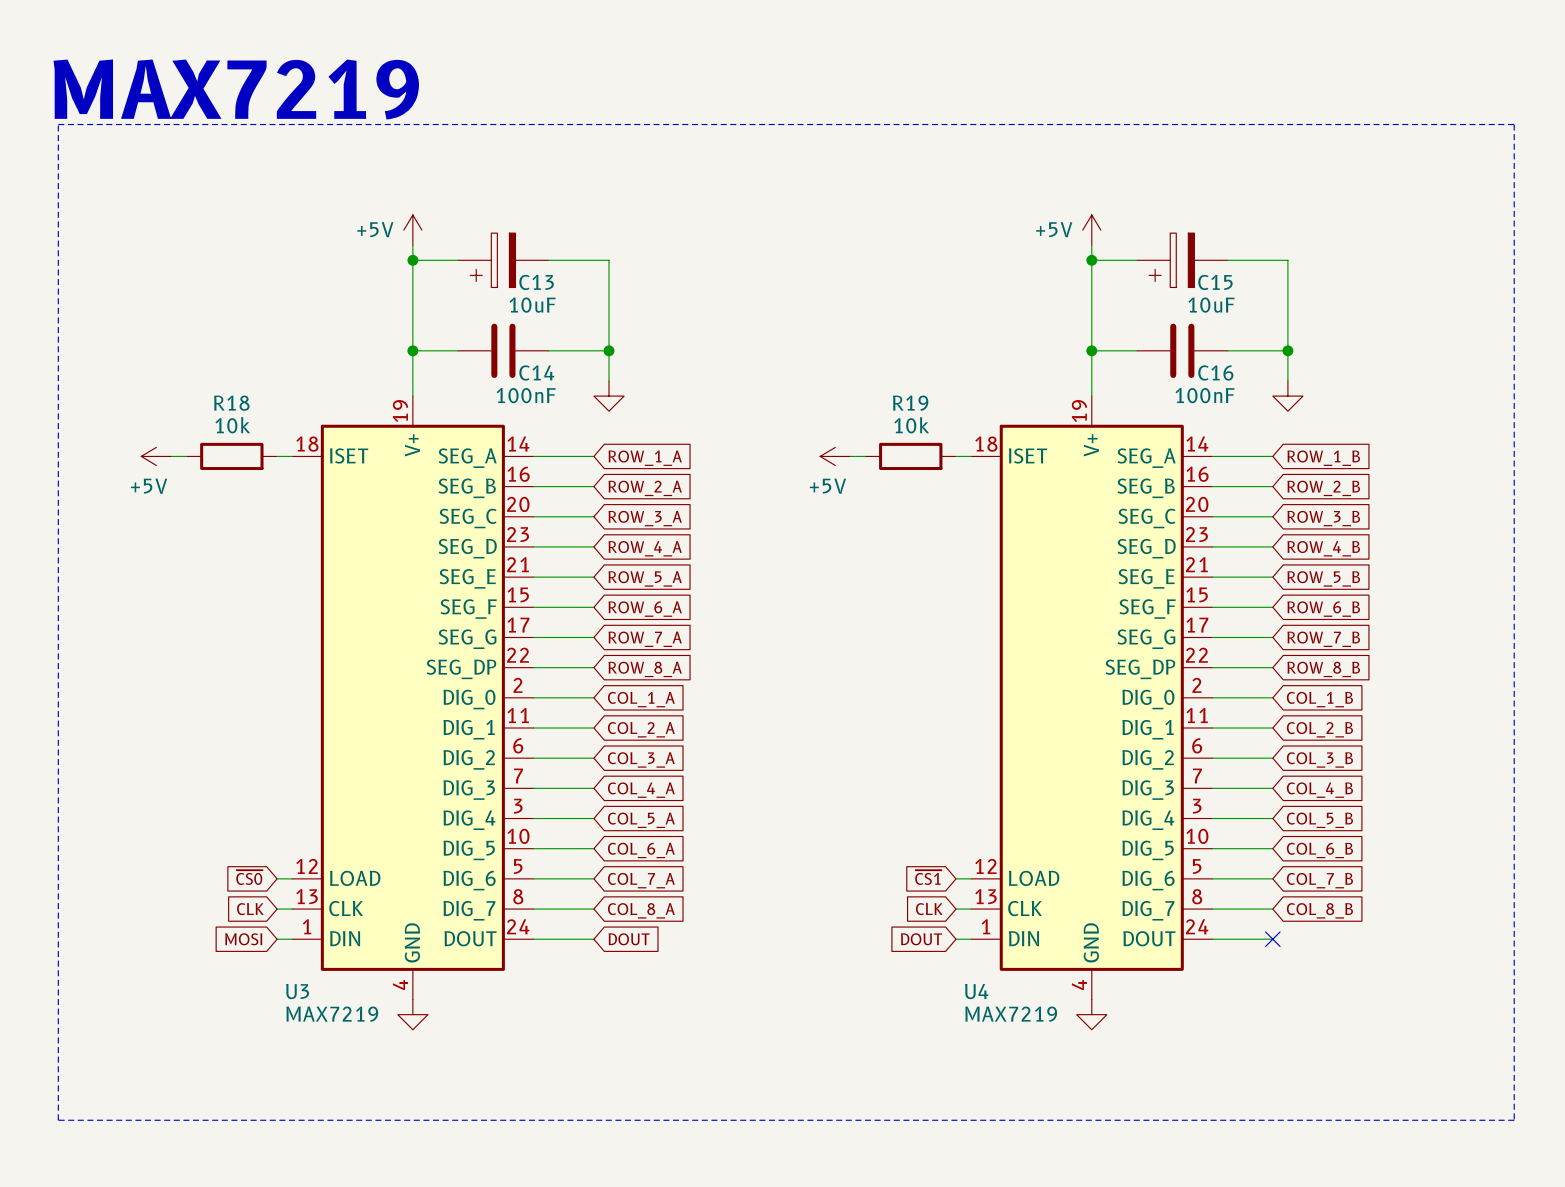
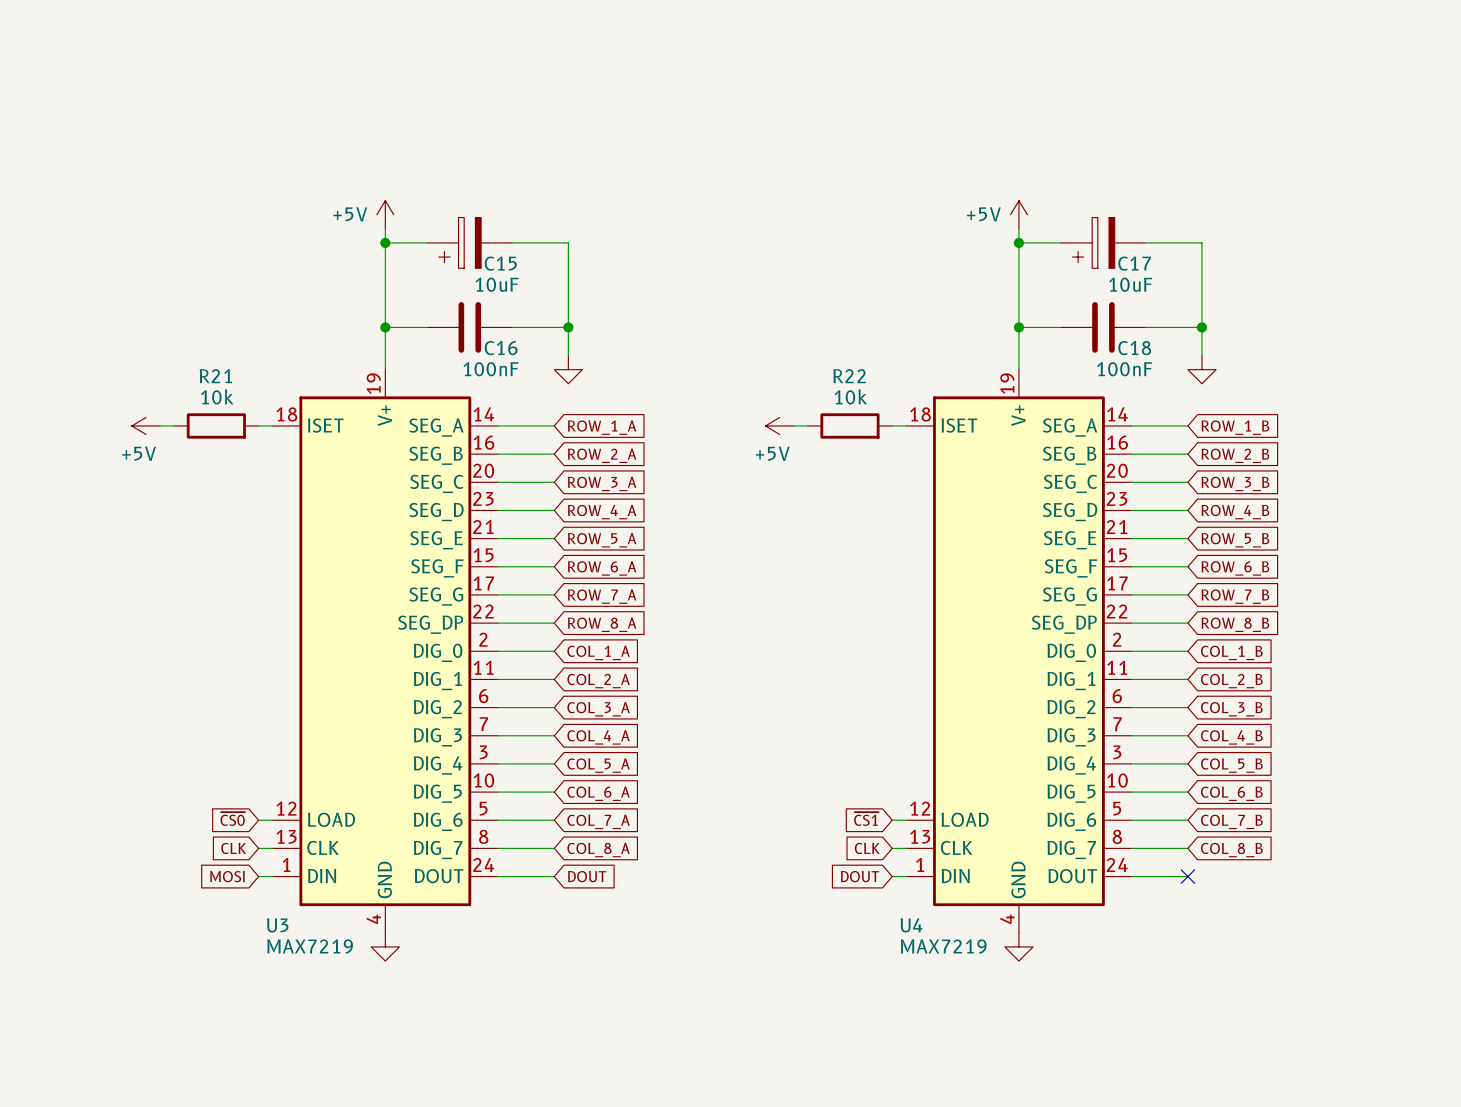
text: MAX7219 (236, 89) -> none
line: (58, 124) (1514, 124) (1514, 1120) (58, 1120) (58, 124) -> none
C13 name: C13 (536, 282) -> C15 (500, 263)
C15 name: C15 (1215, 282) -> C17 (1134, 263)
C14 name: C14 (536, 372) -> C16 (501, 348)
C16 name: C16 (1215, 372) -> C18 (1134, 348)
R18 name: R18 (231, 403) -> R21 (215, 376)
R19 name: R19 (910, 403) -> R22 (849, 376)

